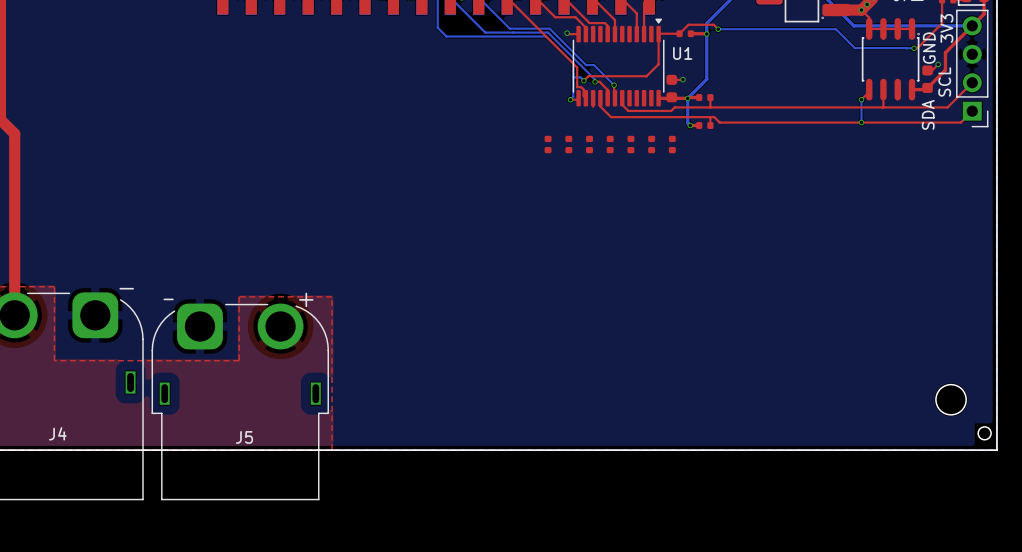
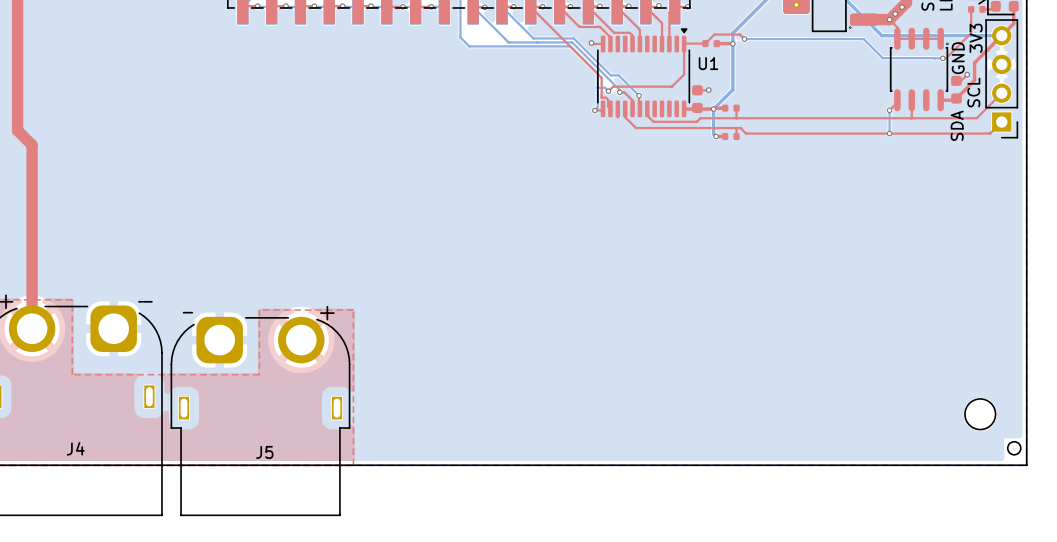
part: (548, 144) -> none
part: (568, 144) -> none
part: (589, 144) -> none
part: (610, 144) -> none
part: (630, 144) -> none
part: (651, 144) -> none
part: (672, 144) -> none

